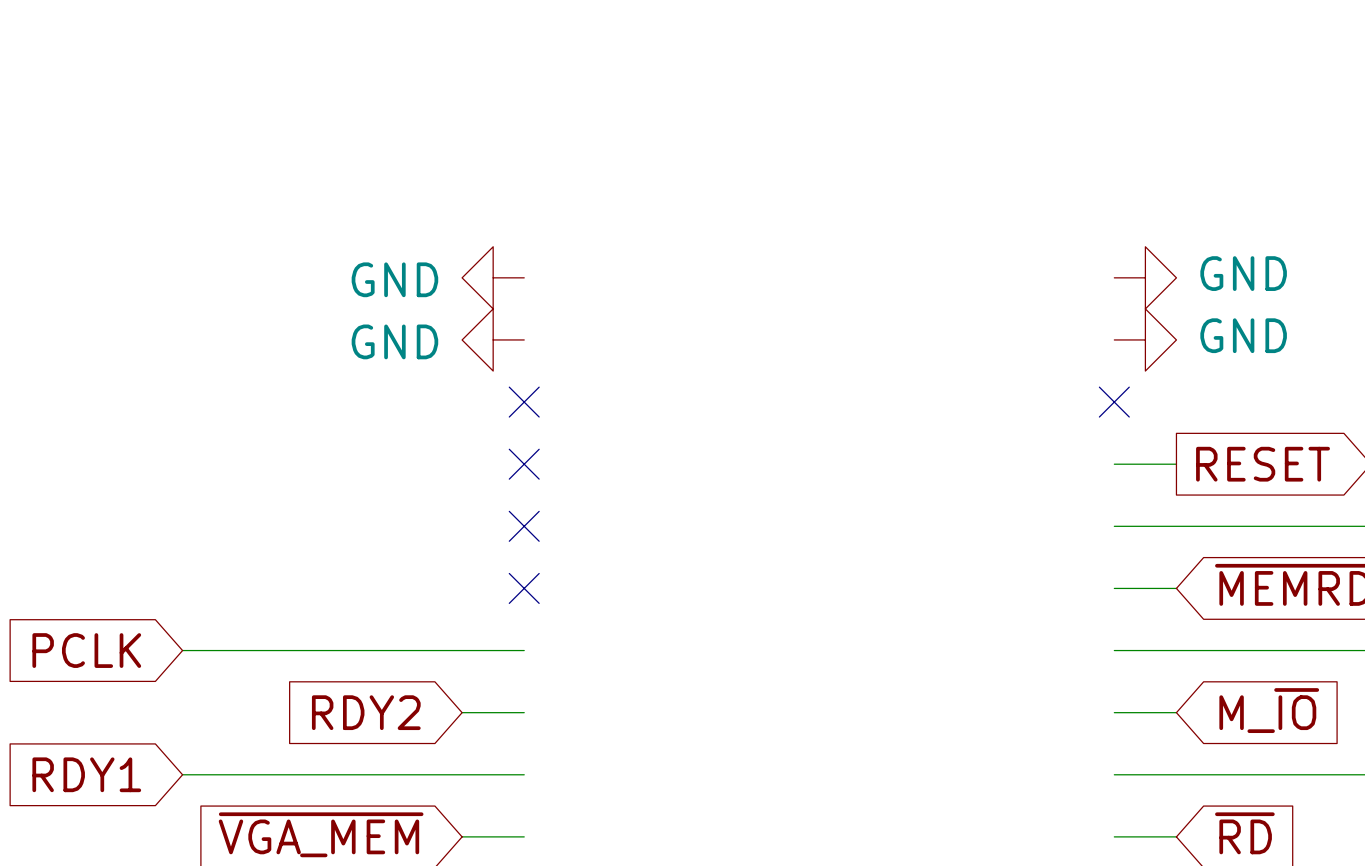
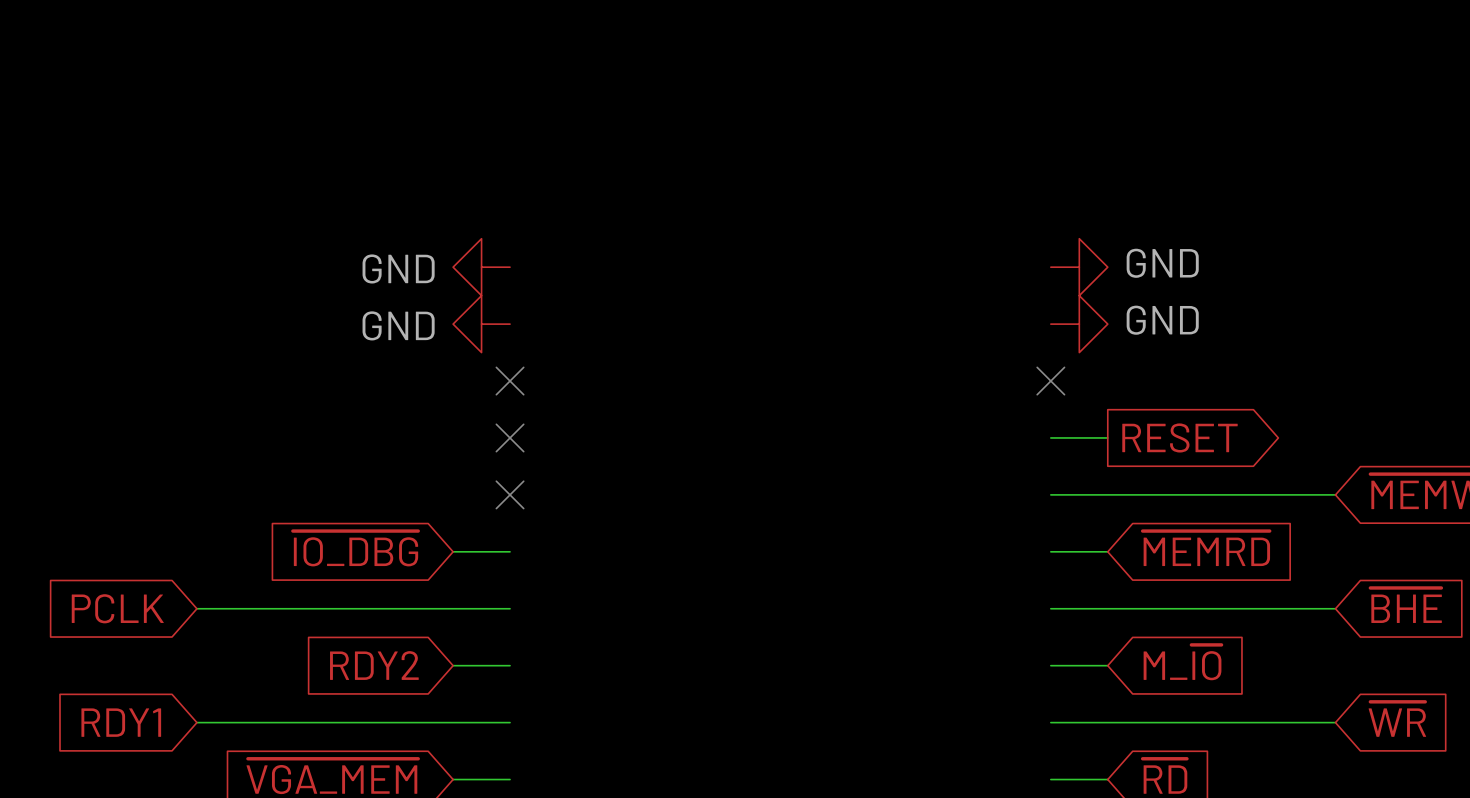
global label: none -> ~{IO_DBG} (355, 548)
wire: none -> (453, 551) (510, 551)
no-connect mark: (524, 588) -> none

